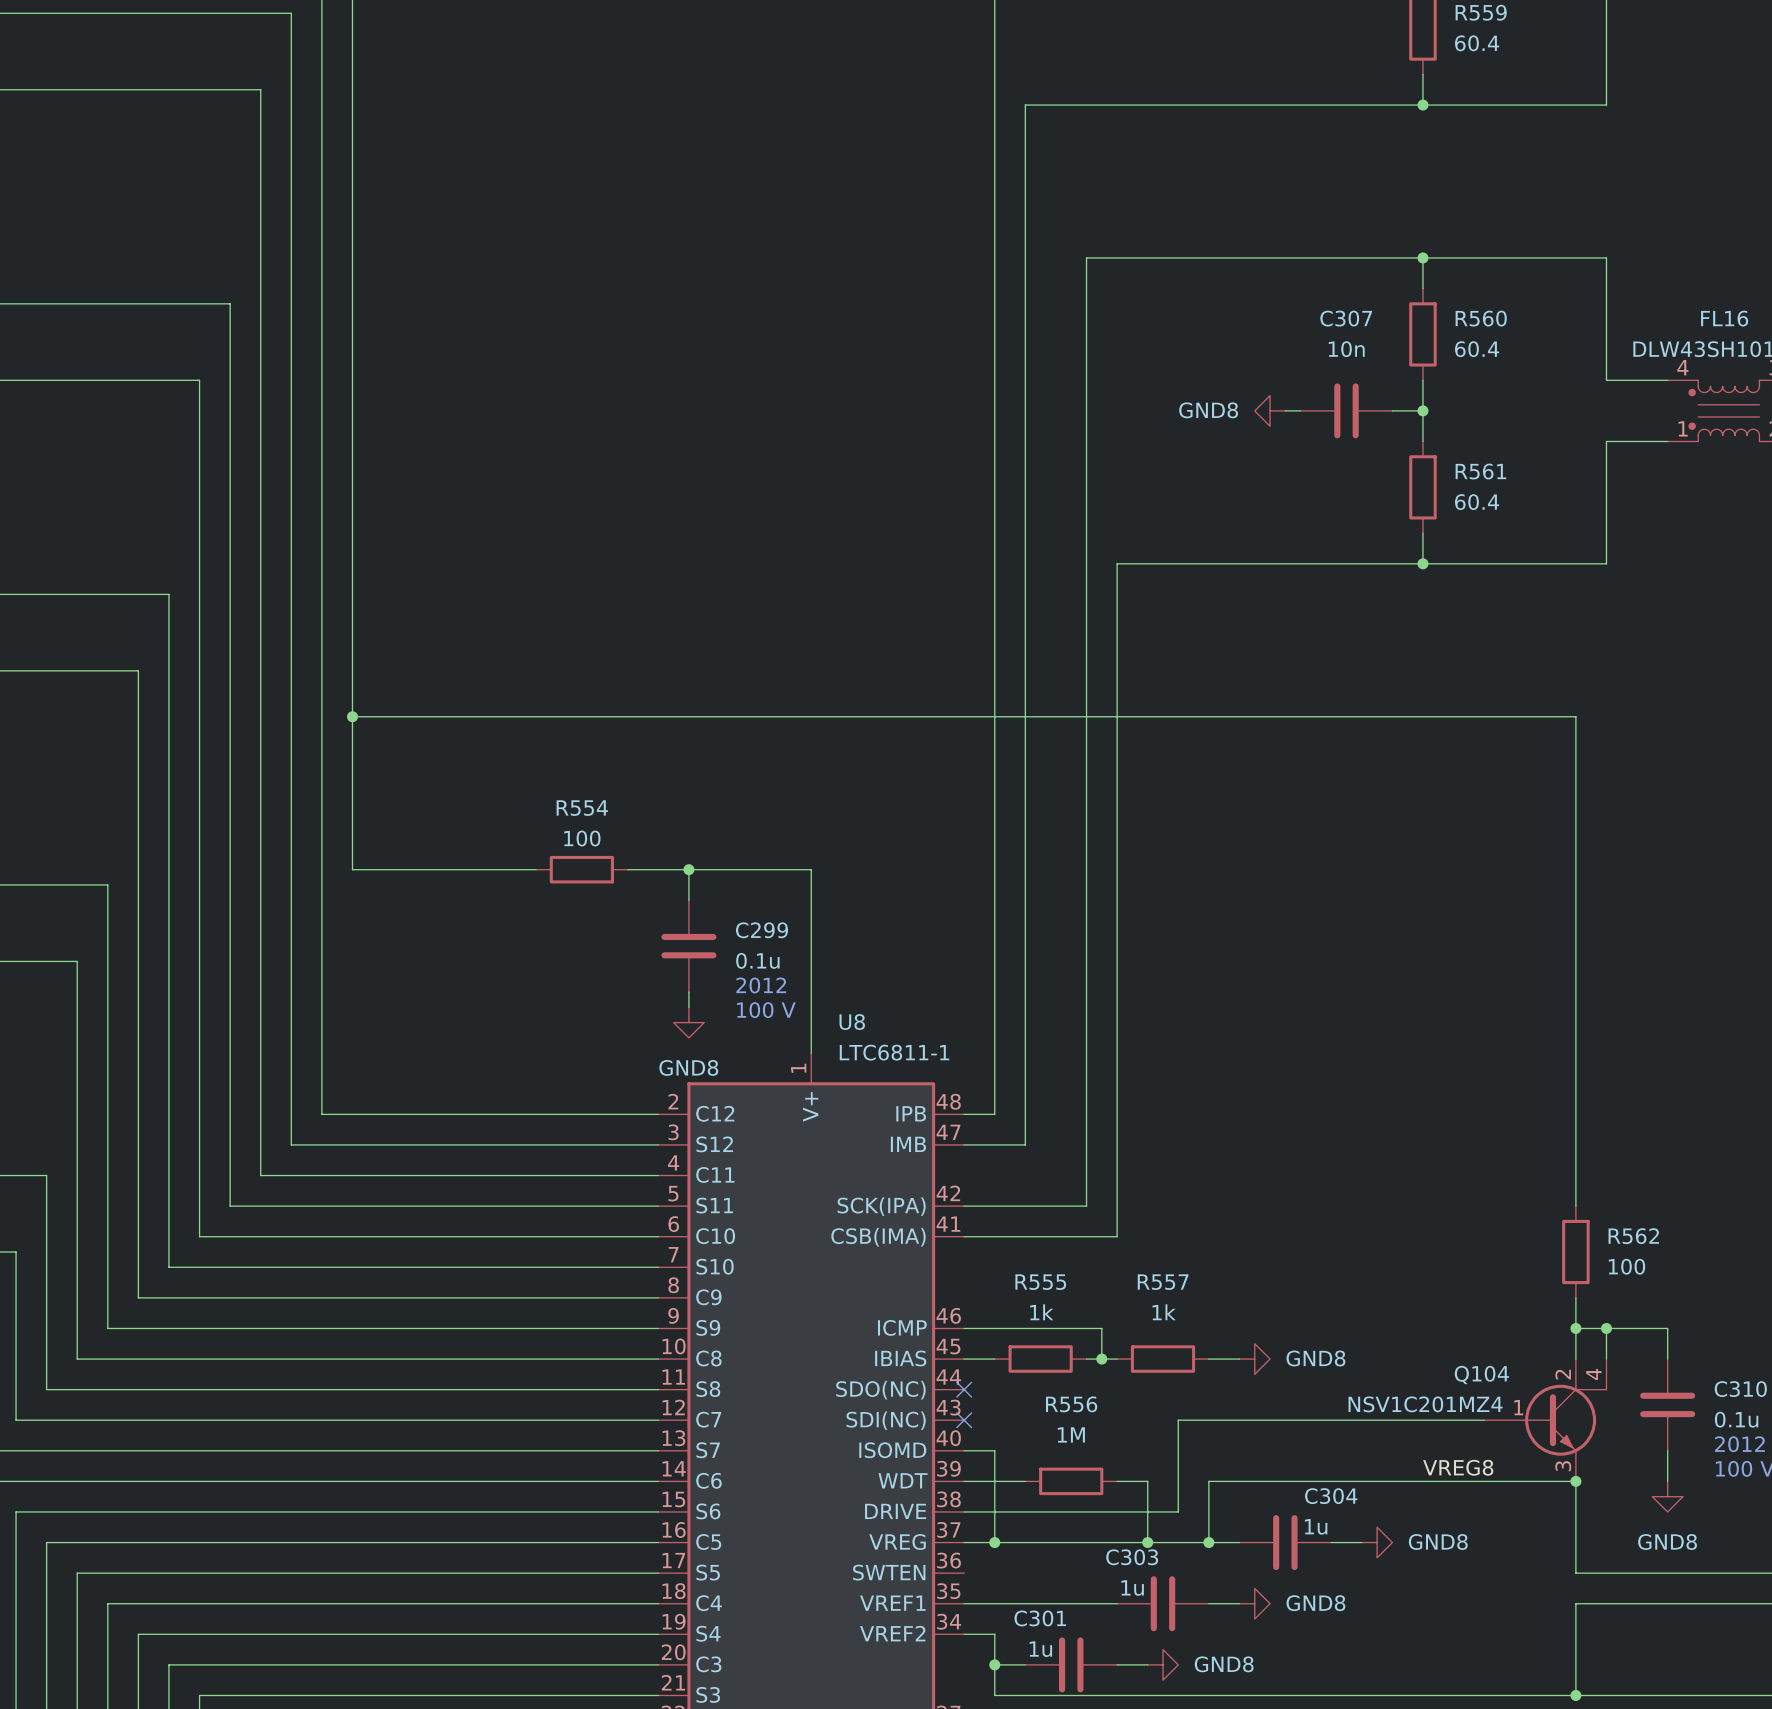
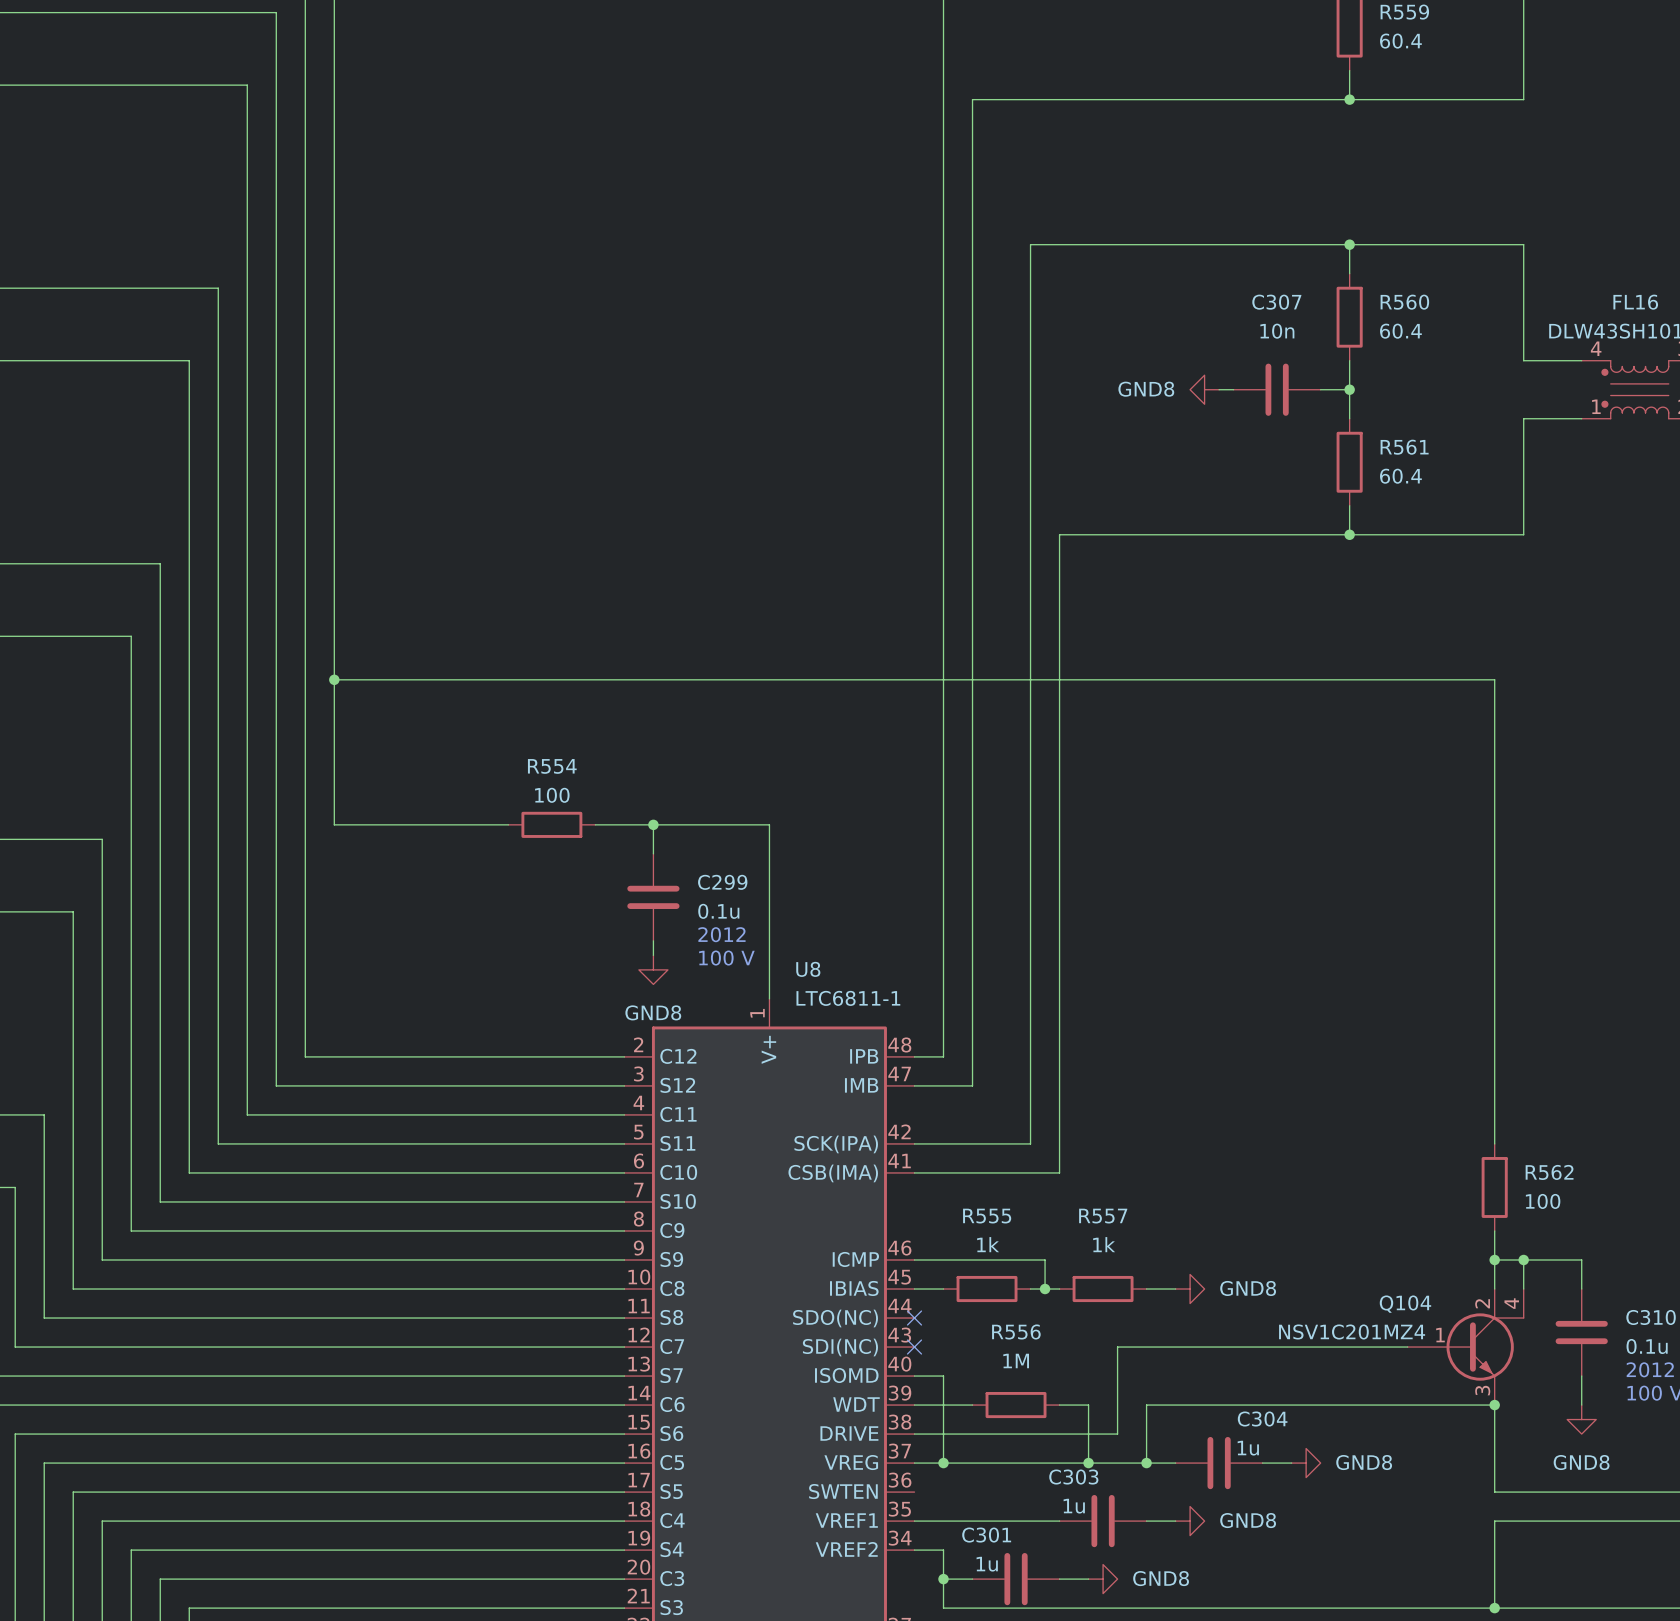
label: VREG8 (1458, 1467) -> none

